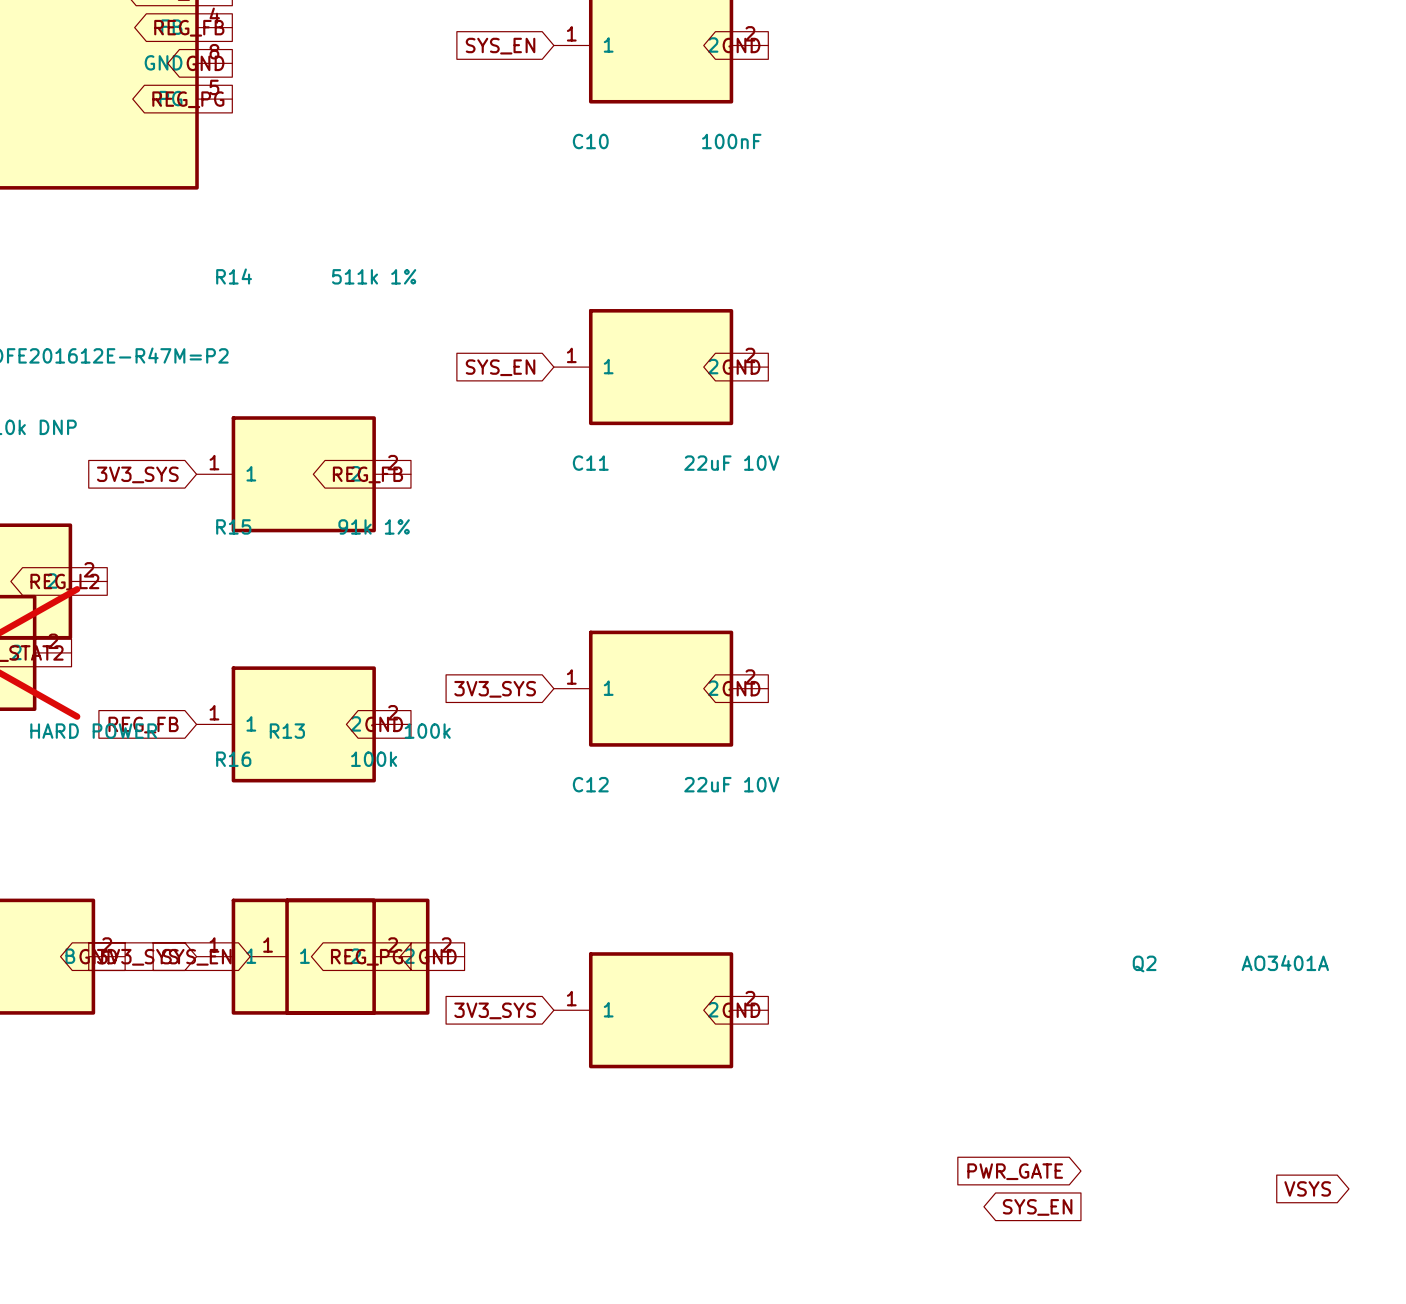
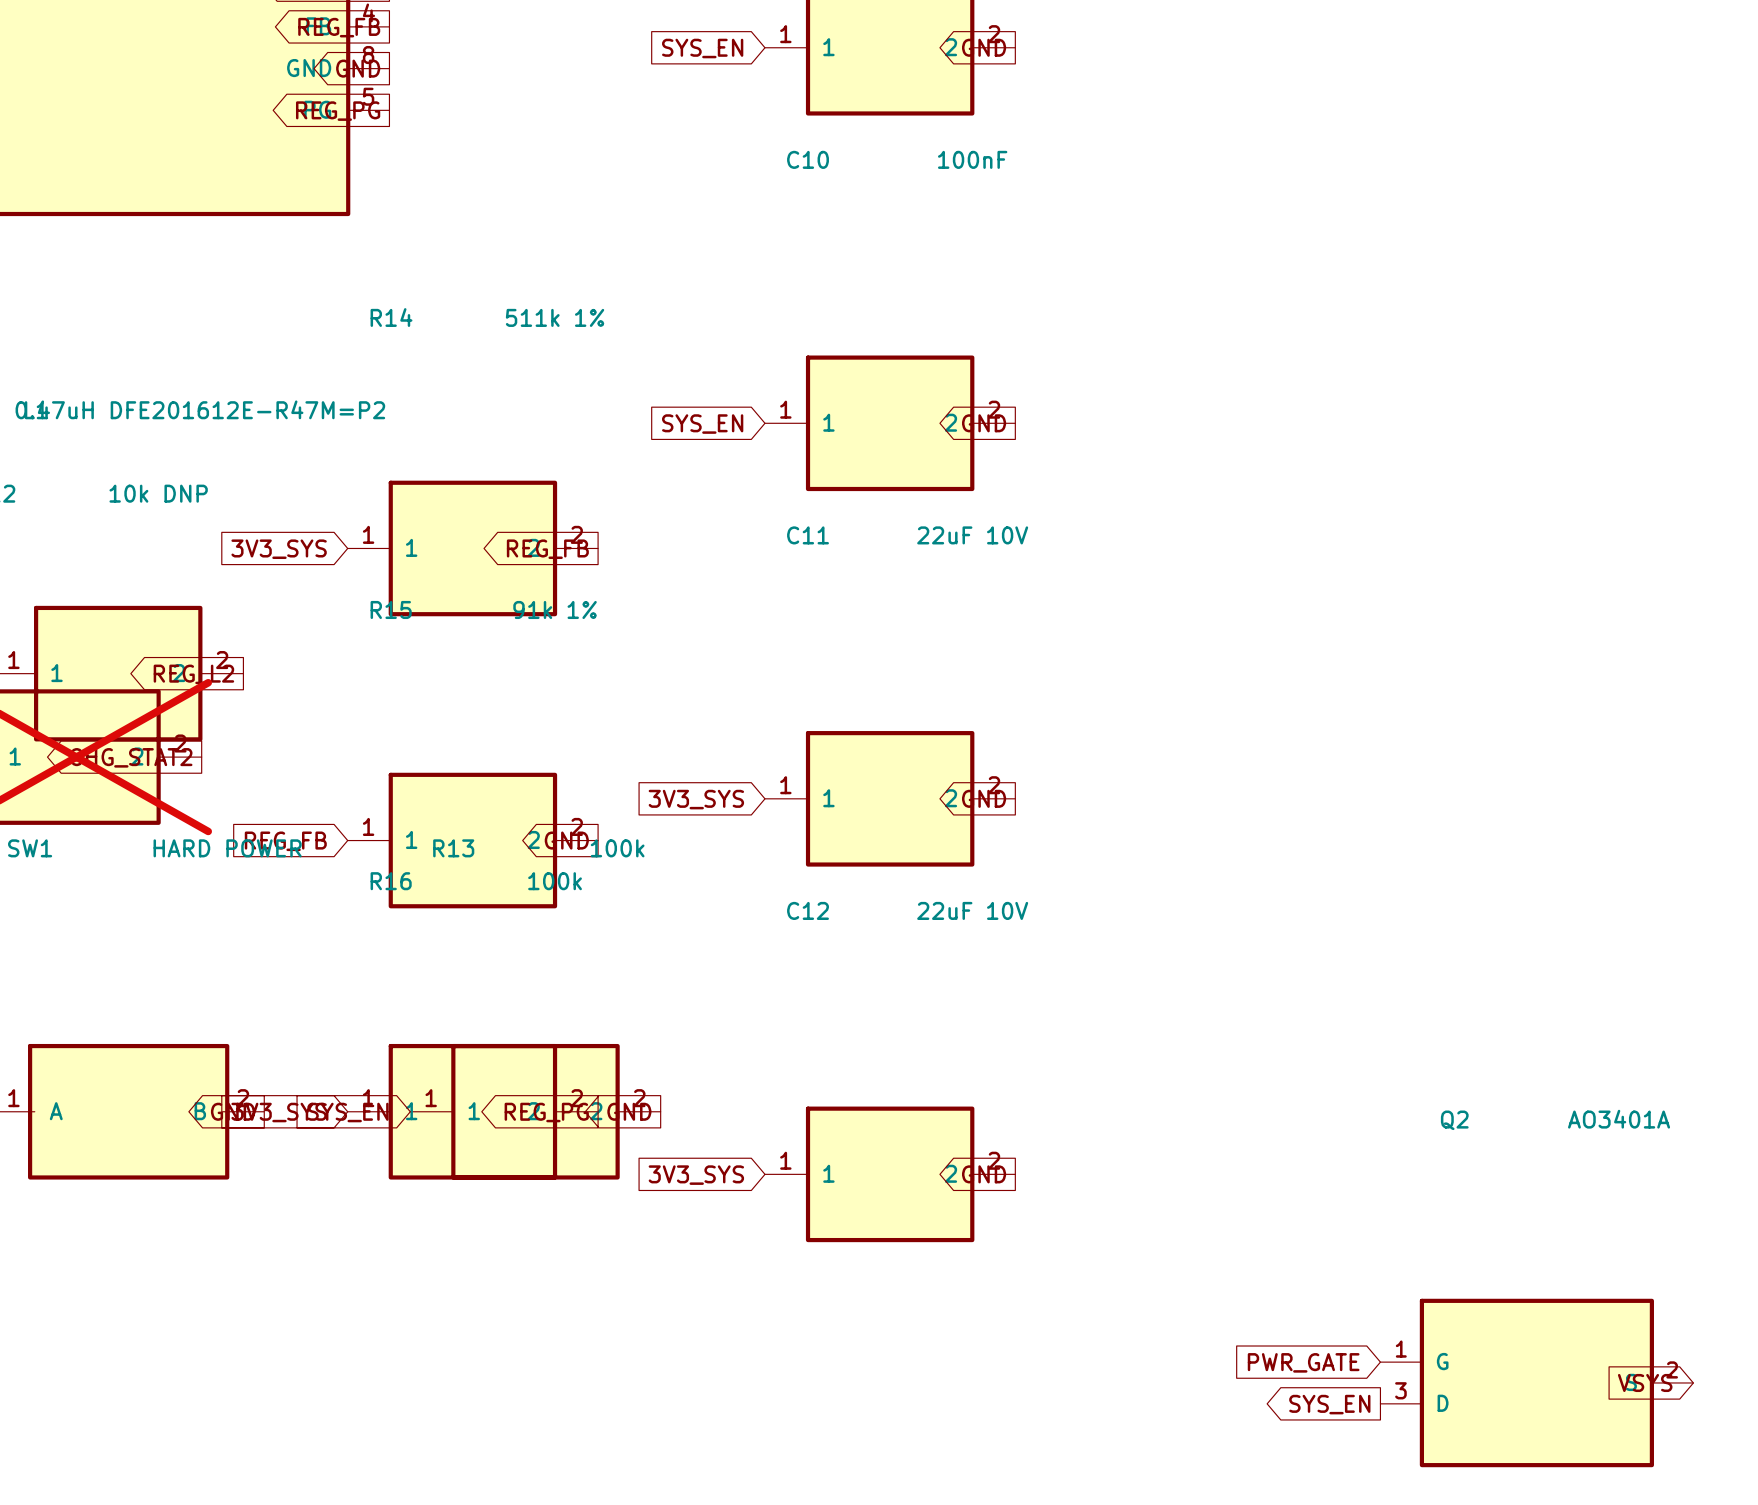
Q2 symbol: [1132, 954, 1330, 973] -> [1380, 1298, 1694, 1468]

